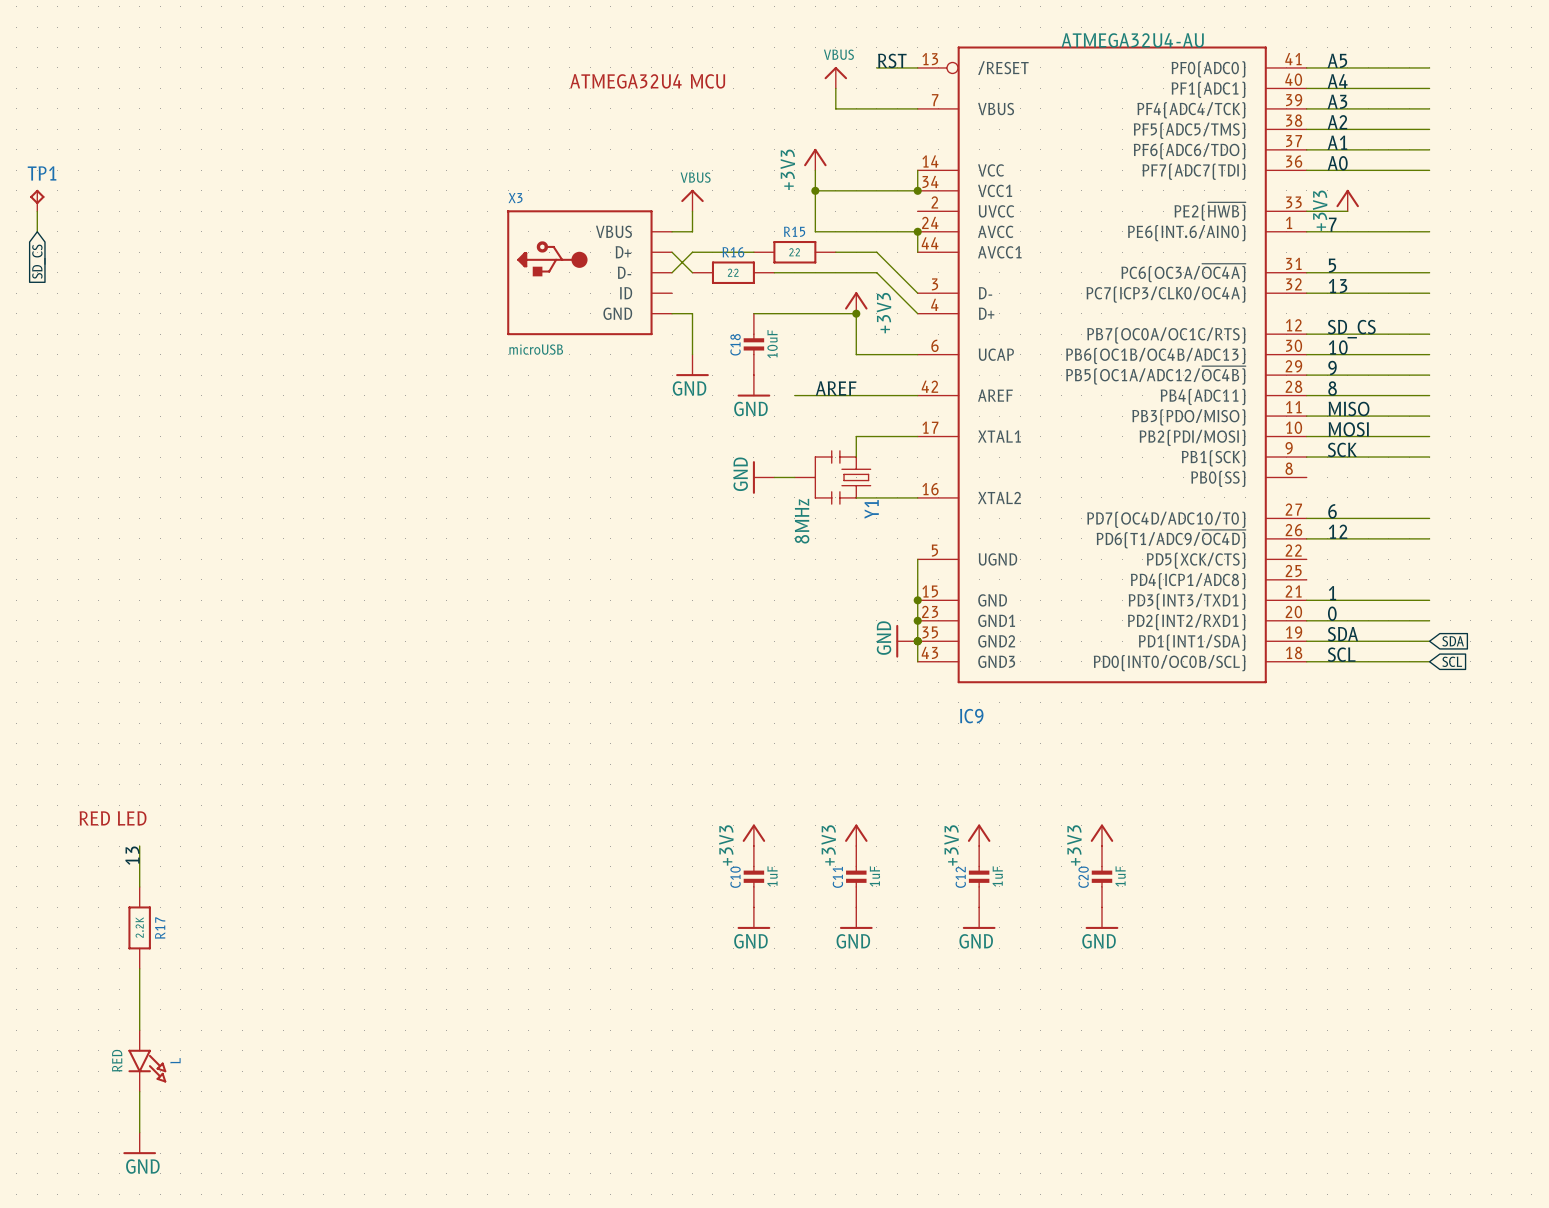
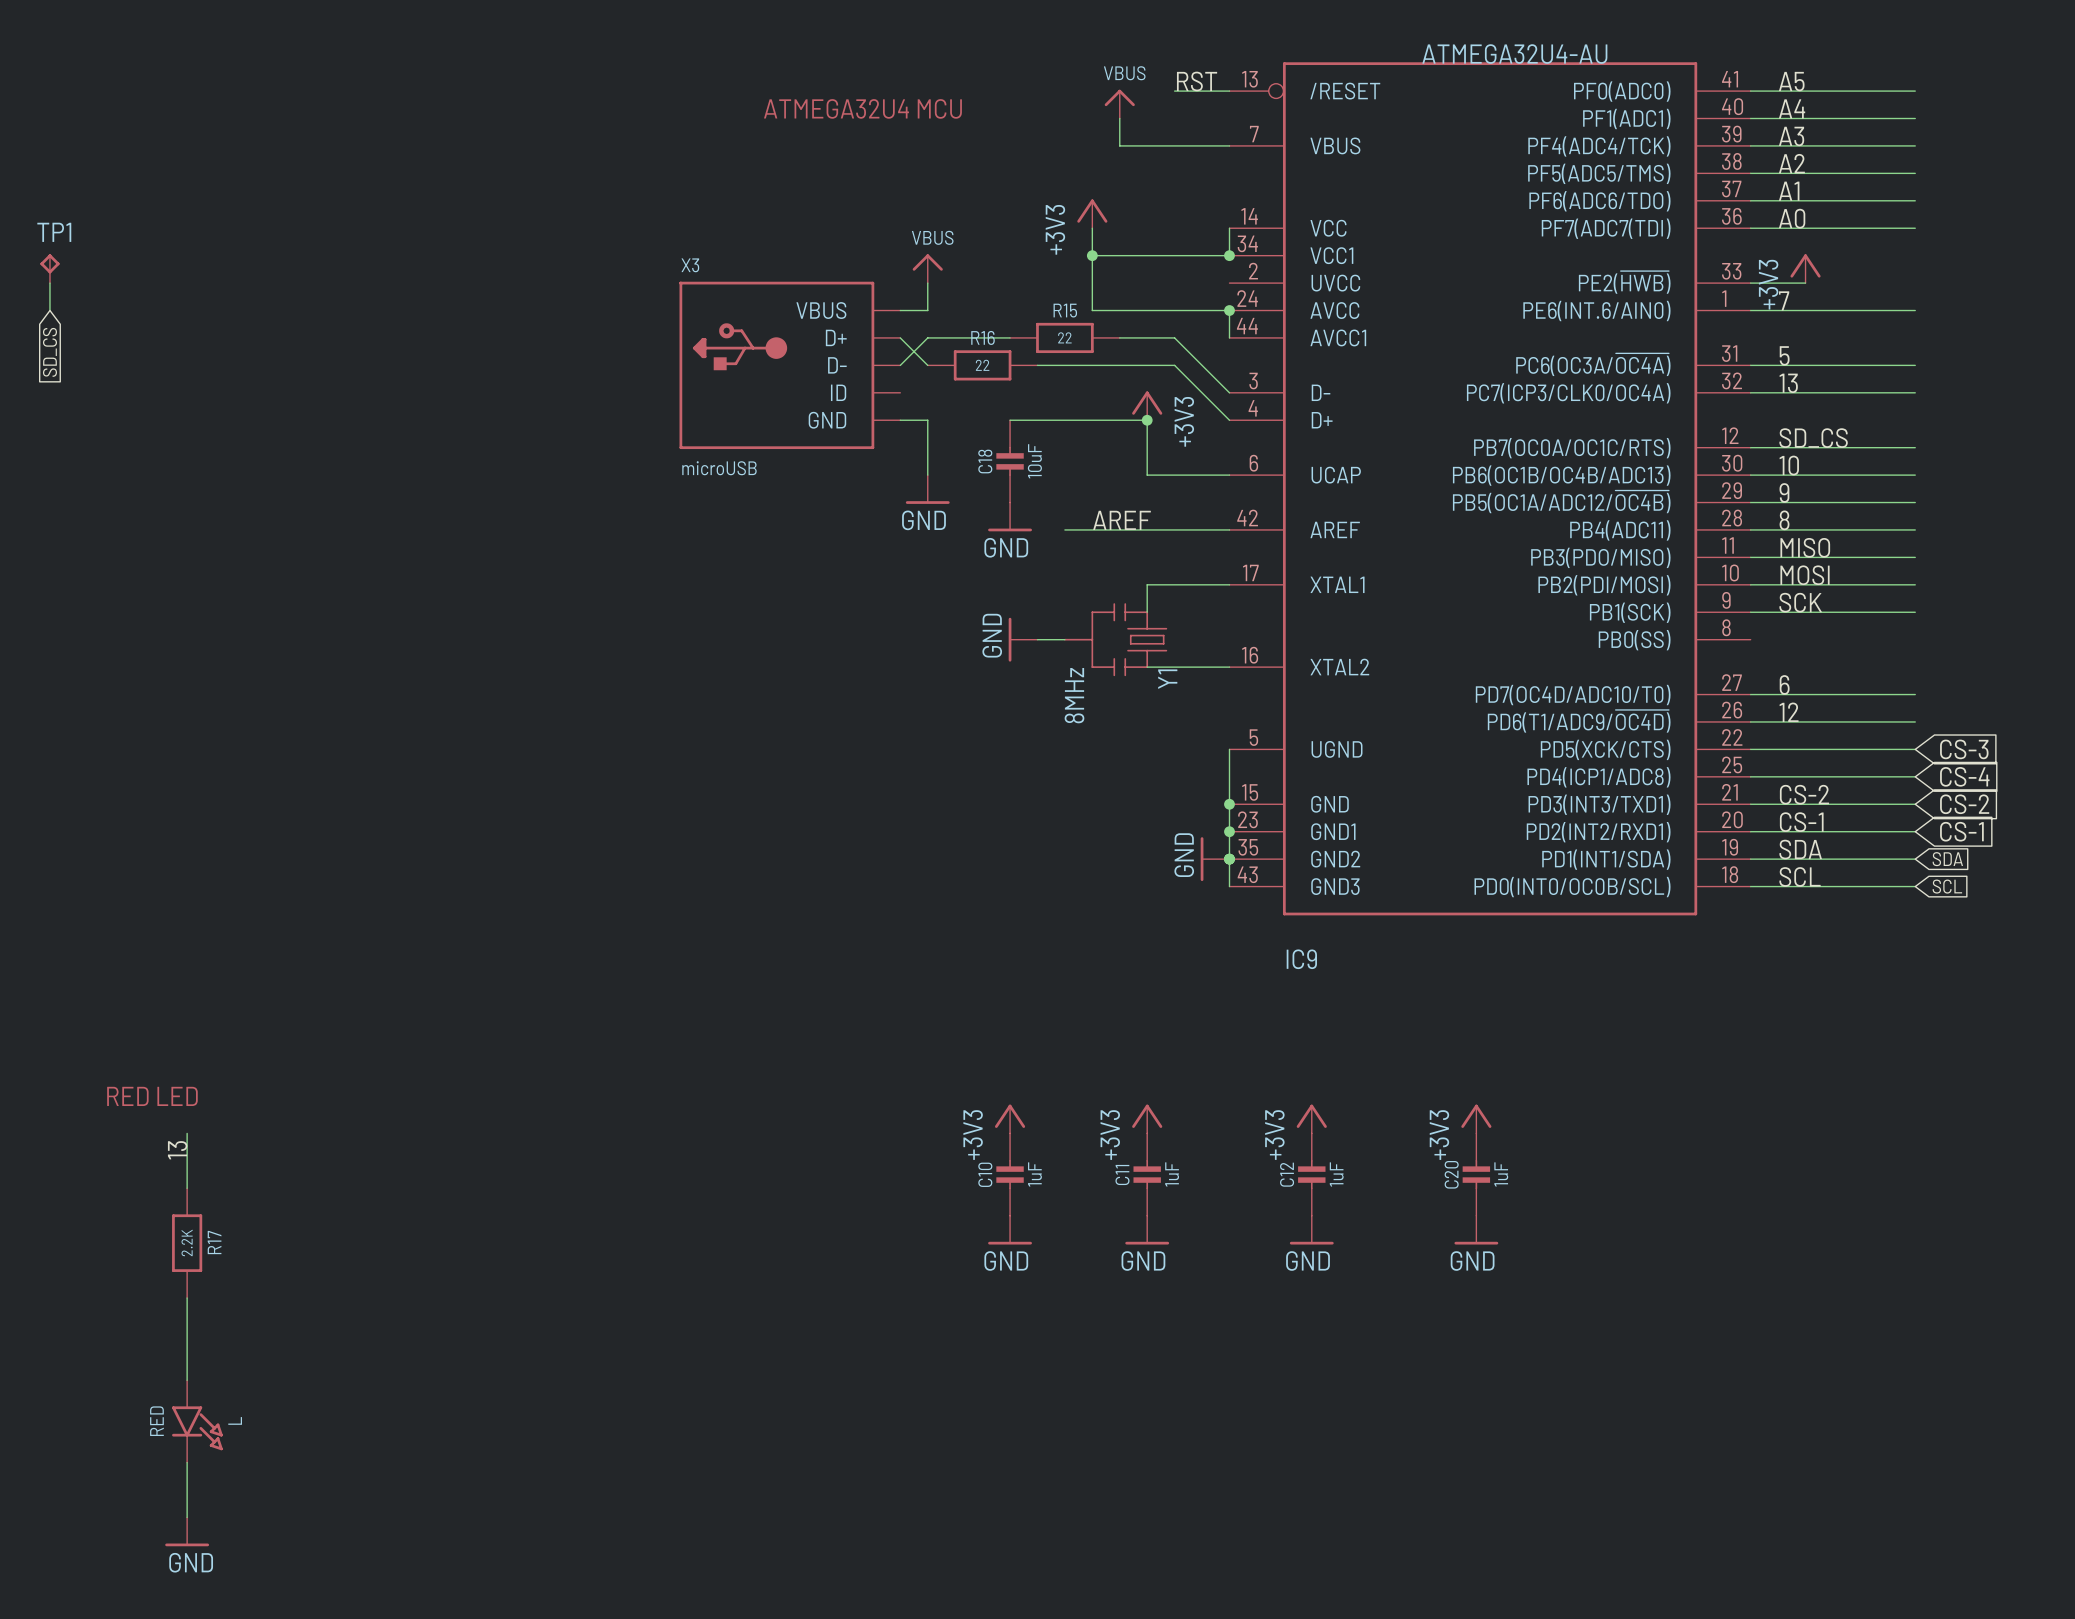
wire: none -> (1750, 749) (1915, 749)
global label: none -> CS-3 (1964, 749)
wire: none -> (1750, 776) (1915, 776)
global label: none -> CS-4 (1964, 776)
label: 1 (1332, 593) -> CS-2 (1804, 794)
global label: none -> CS-2 (1964, 804)
label: 0 (1332, 613) -> CS-1 (1801, 822)
global label: none -> CS-1 (1961, 831)

